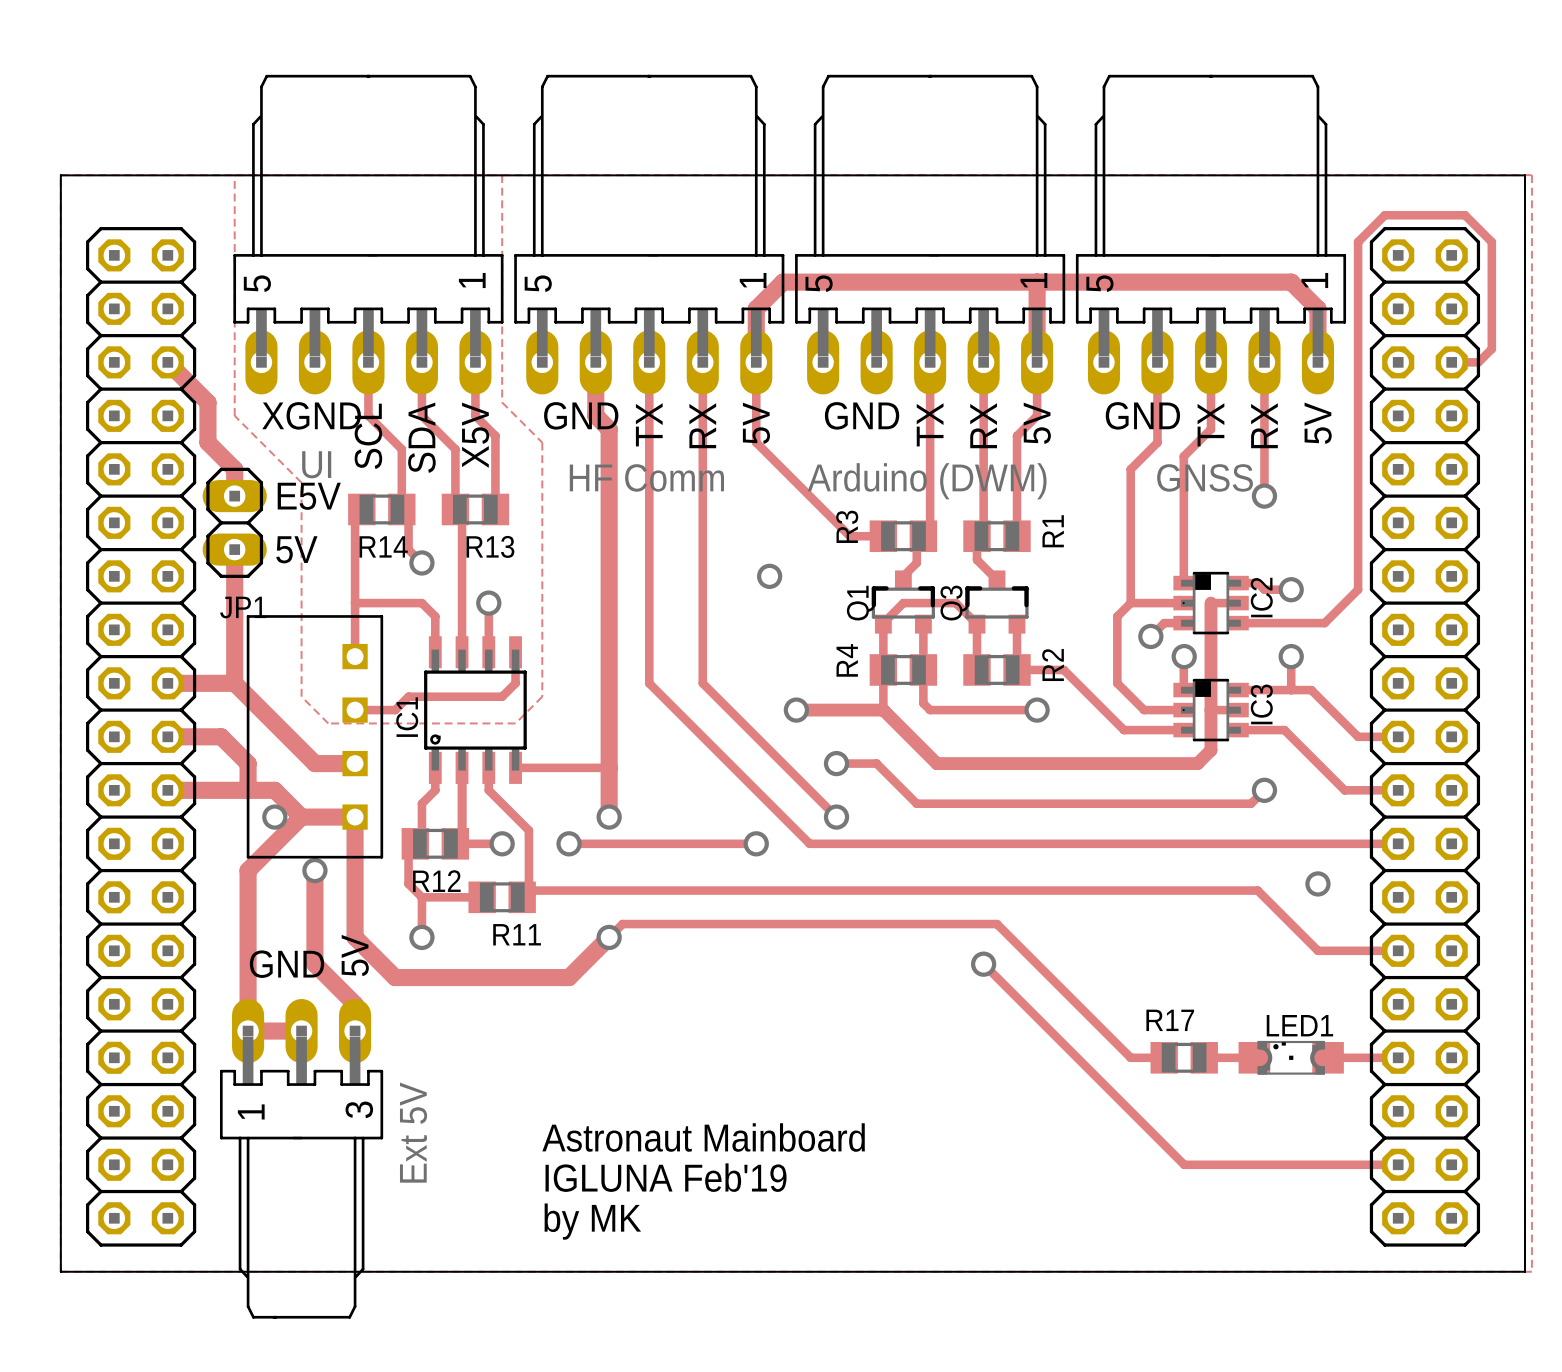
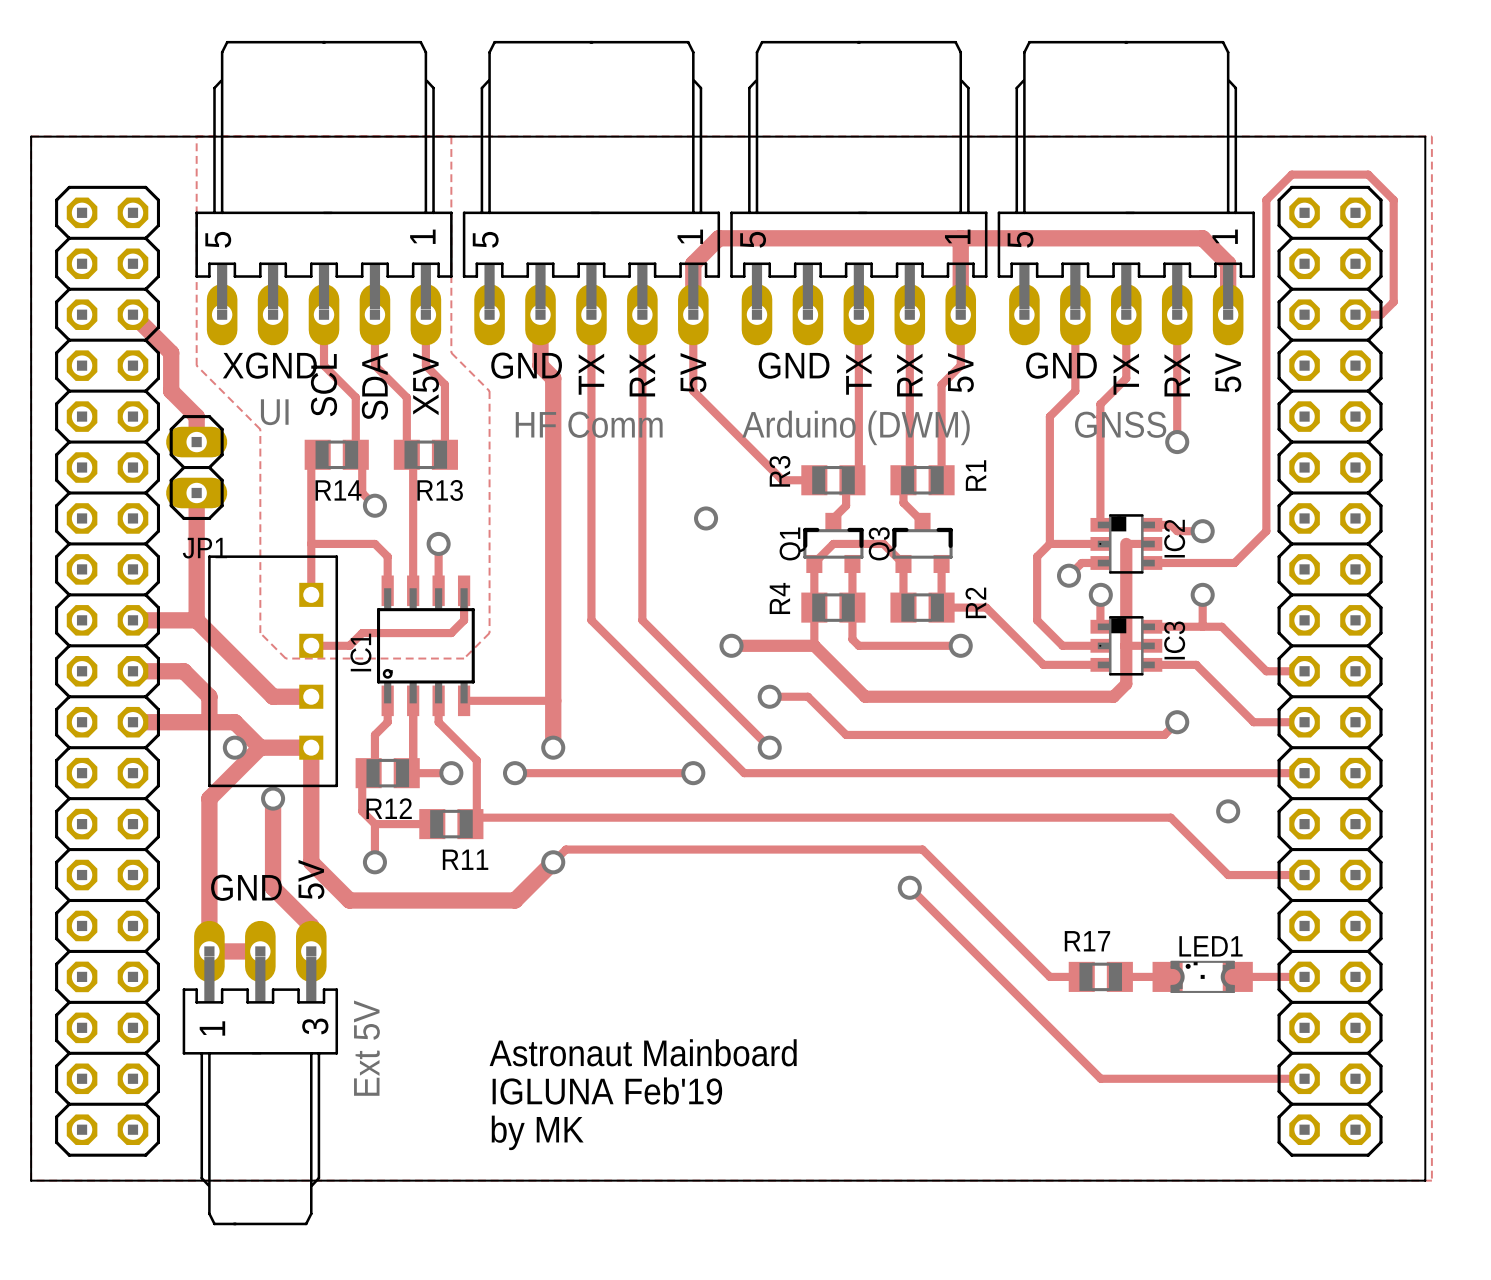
text: E5V (309, 496) -> none
text: 5V (296, 549) -> none

